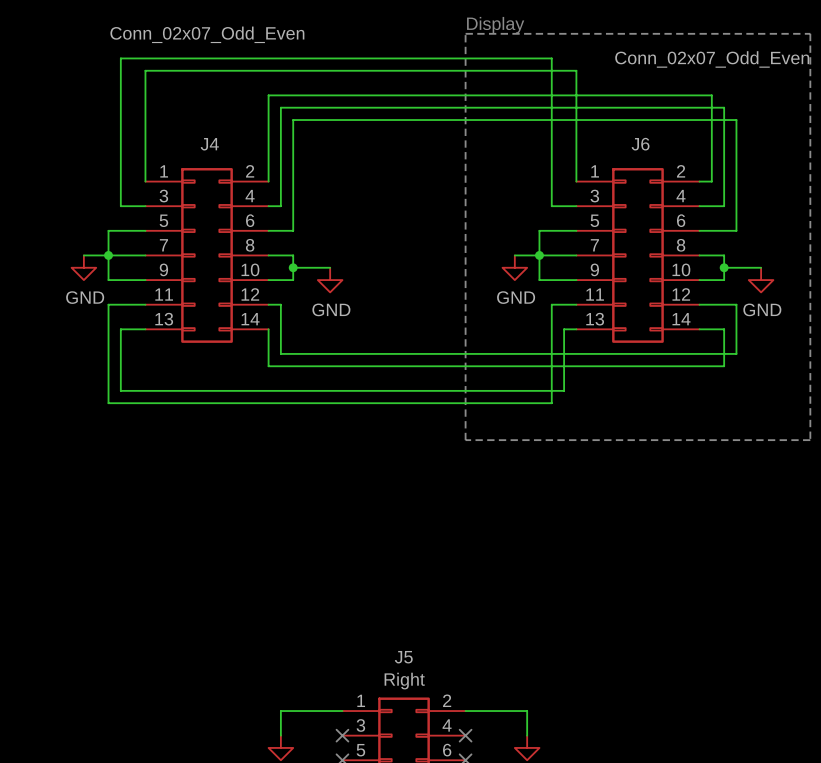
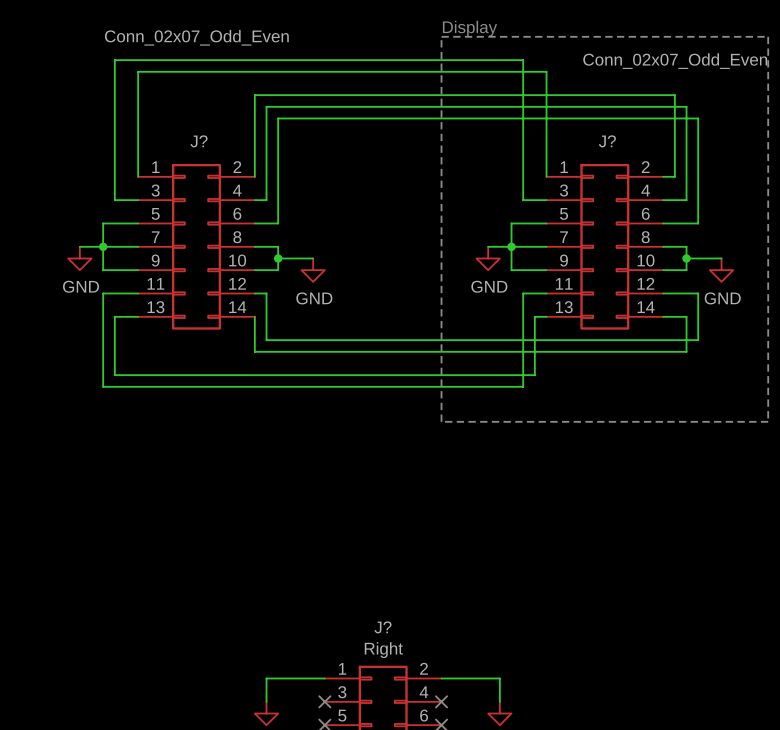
J4 name: J4 (209, 144) -> J? (199, 141)
J6 name: J6 (640, 144) -> J? (607, 141)
J5 name: J5 (403, 657) -> J? (383, 627)

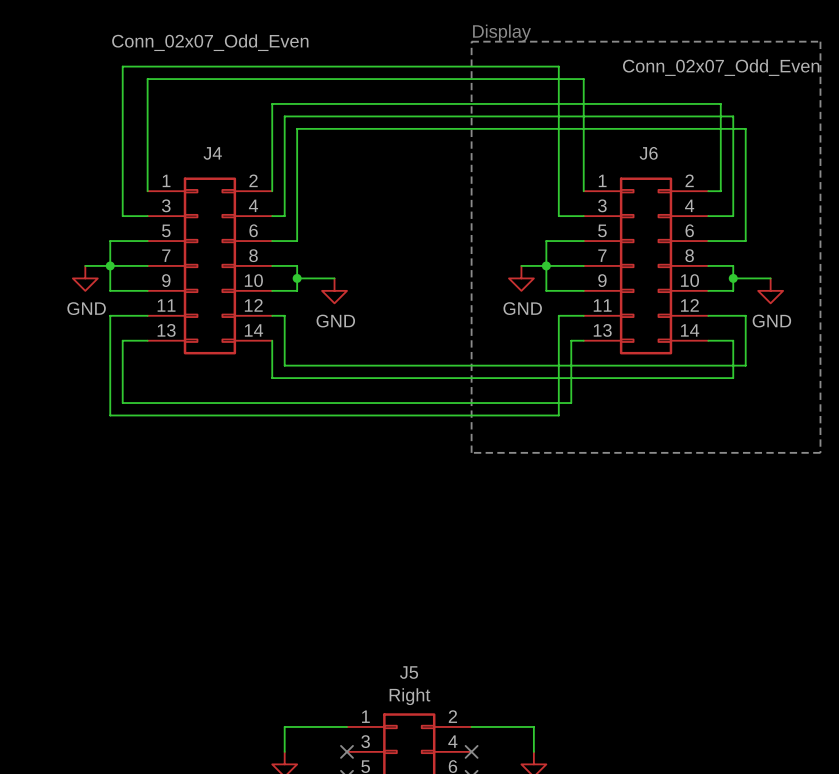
J? name: J? (199, 141) -> J4 (212, 153)
J? name: J? (607, 141) -> J6 (648, 153)
J? name: J? (383, 627) -> J5 (409, 672)

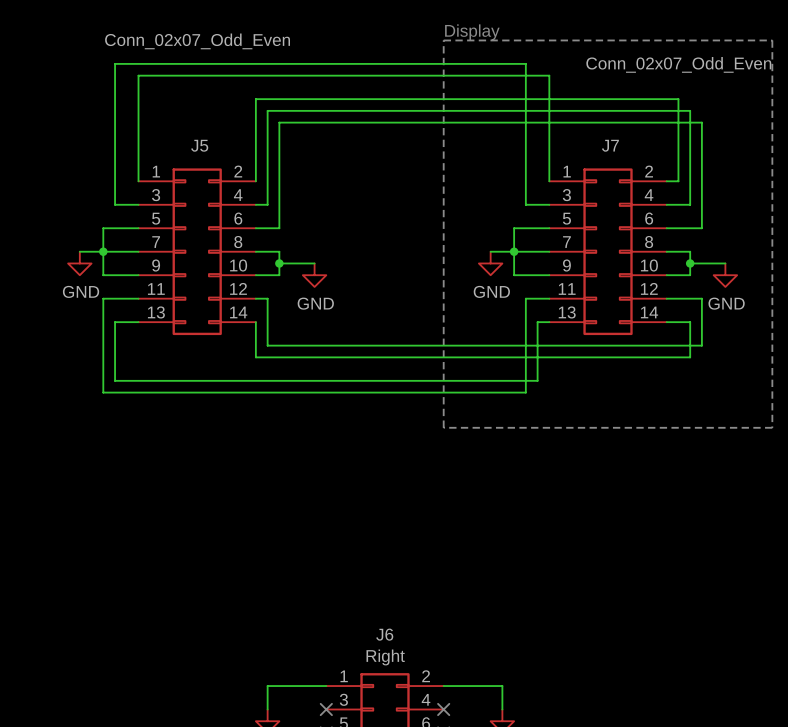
J4 name: J4 (212, 153) -> J5 (199, 145)
J6 name: J6 (648, 153) -> J7 (610, 145)
J5 name: J5 (409, 672) -> J6 (384, 634)

